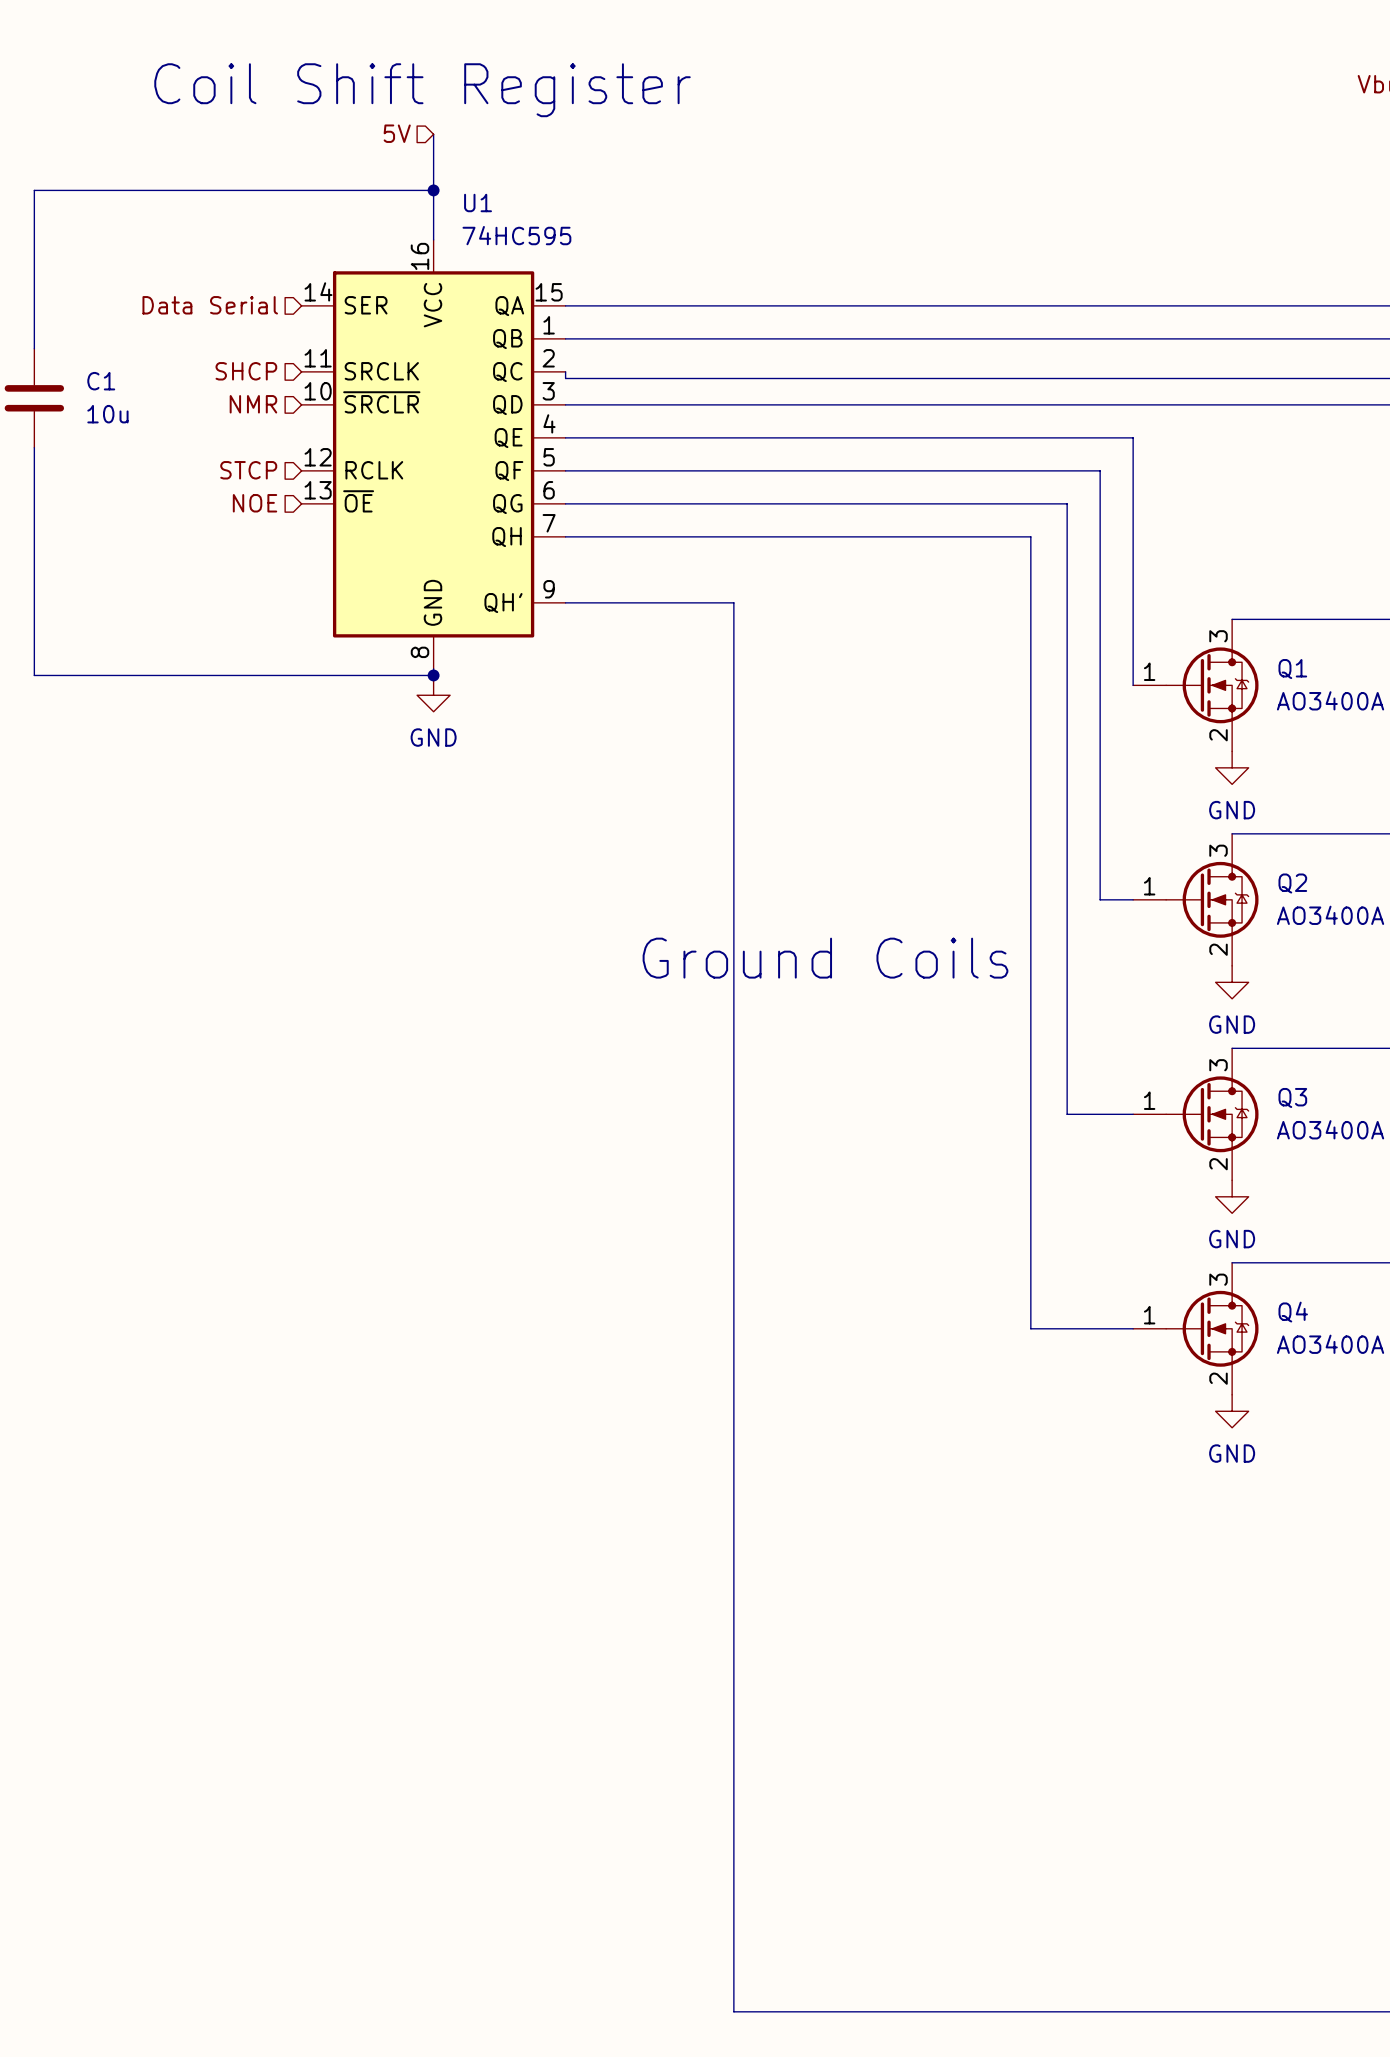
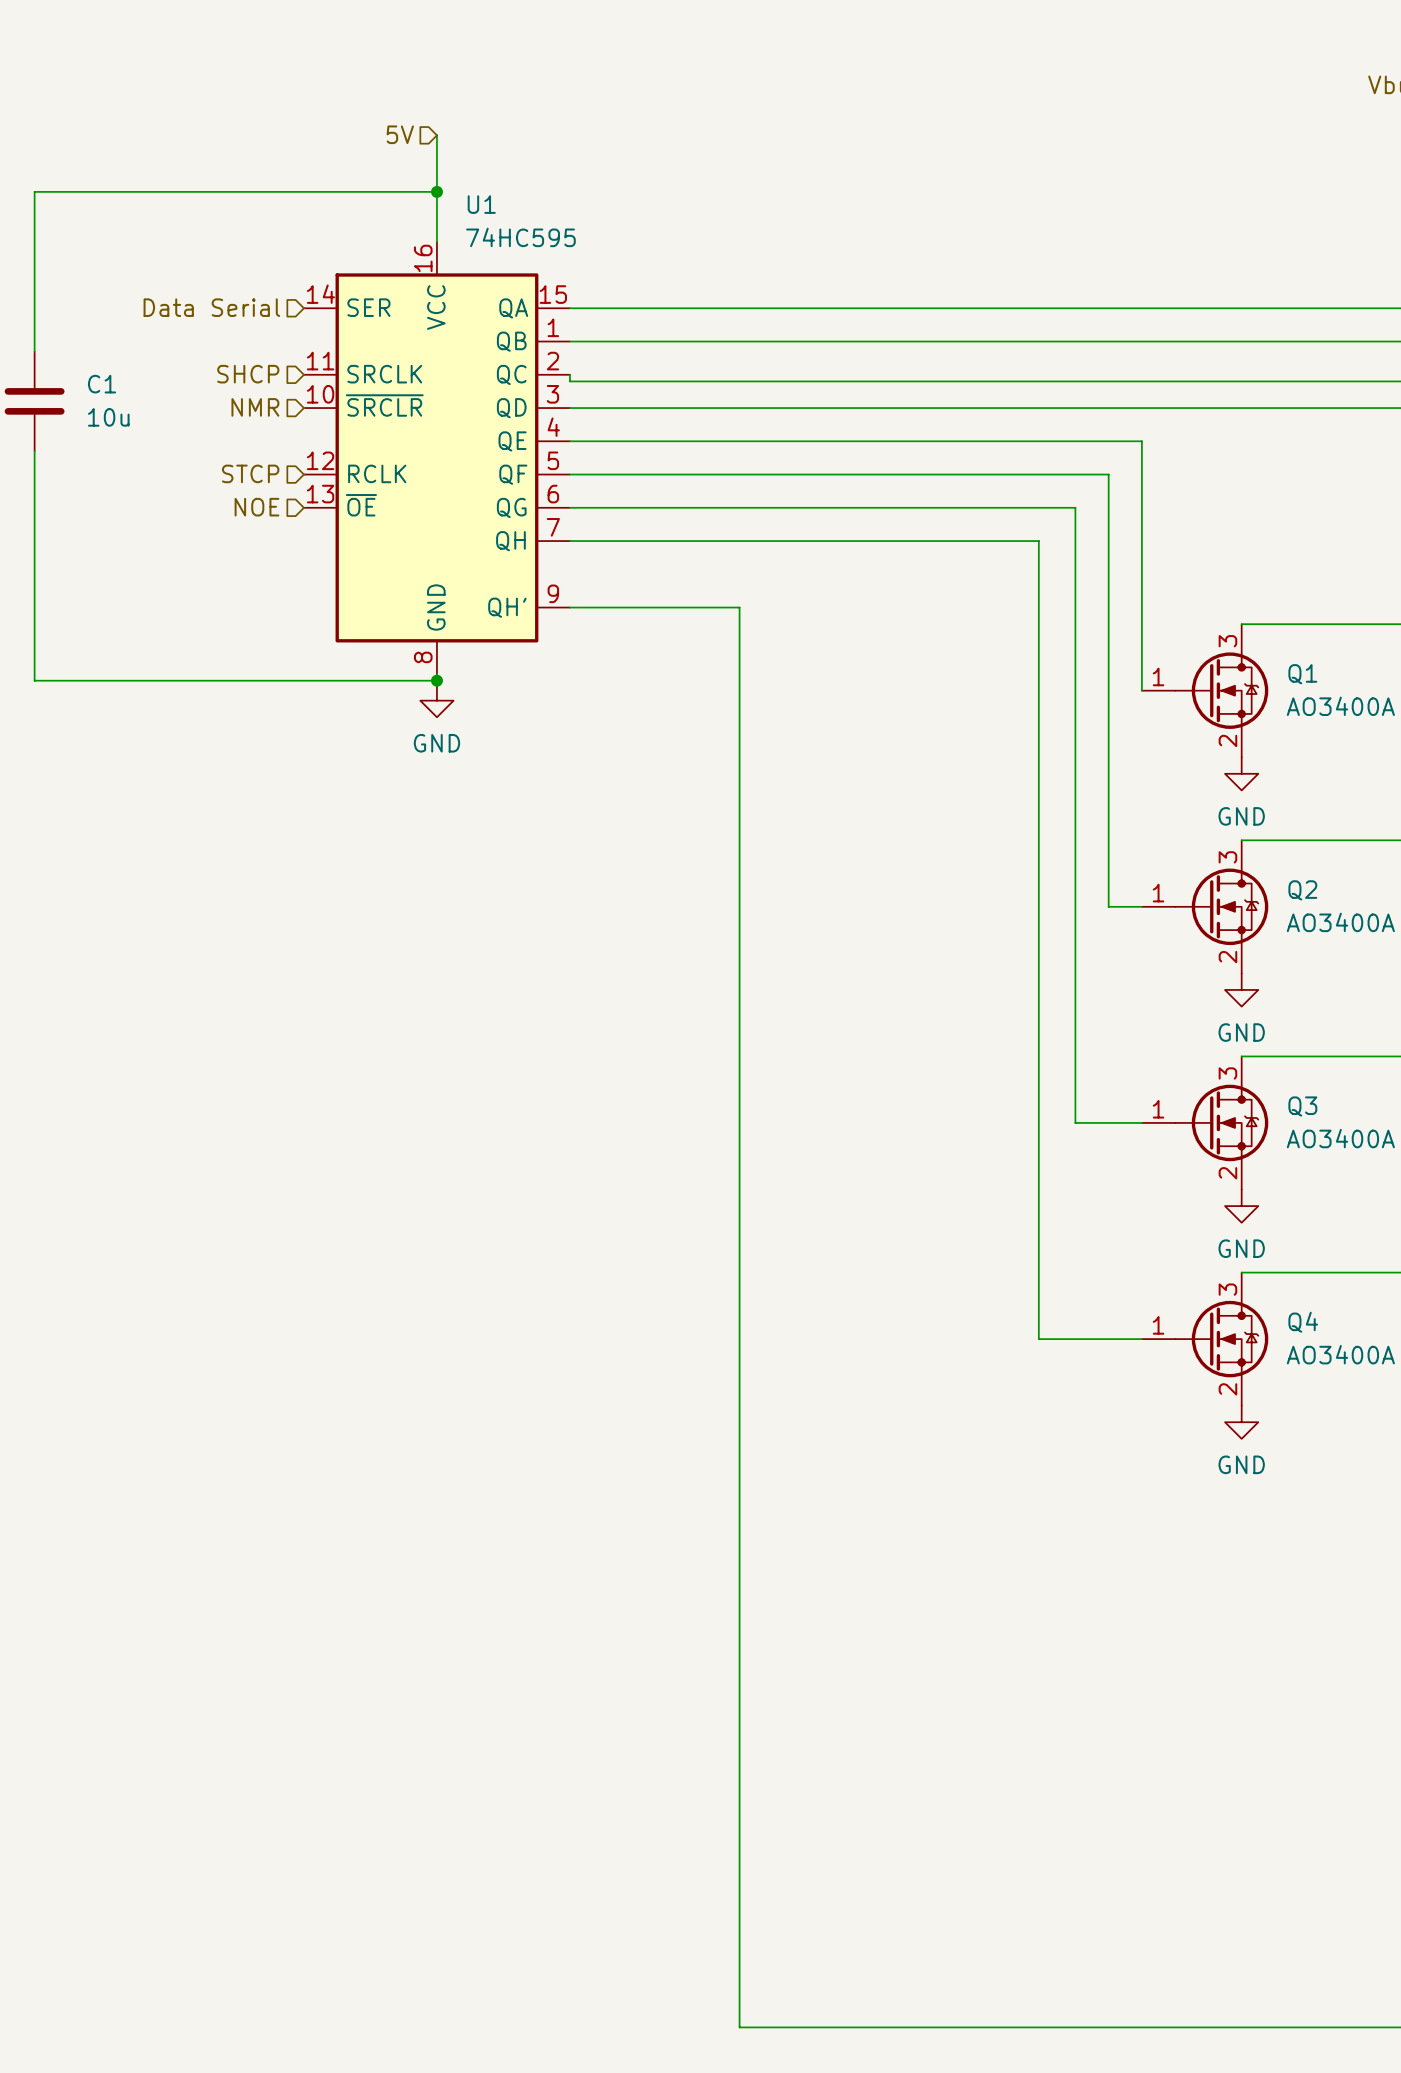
text: Coil Shift Register (422, 90) -> none
text: Ground Coils (825, 958) -> none

